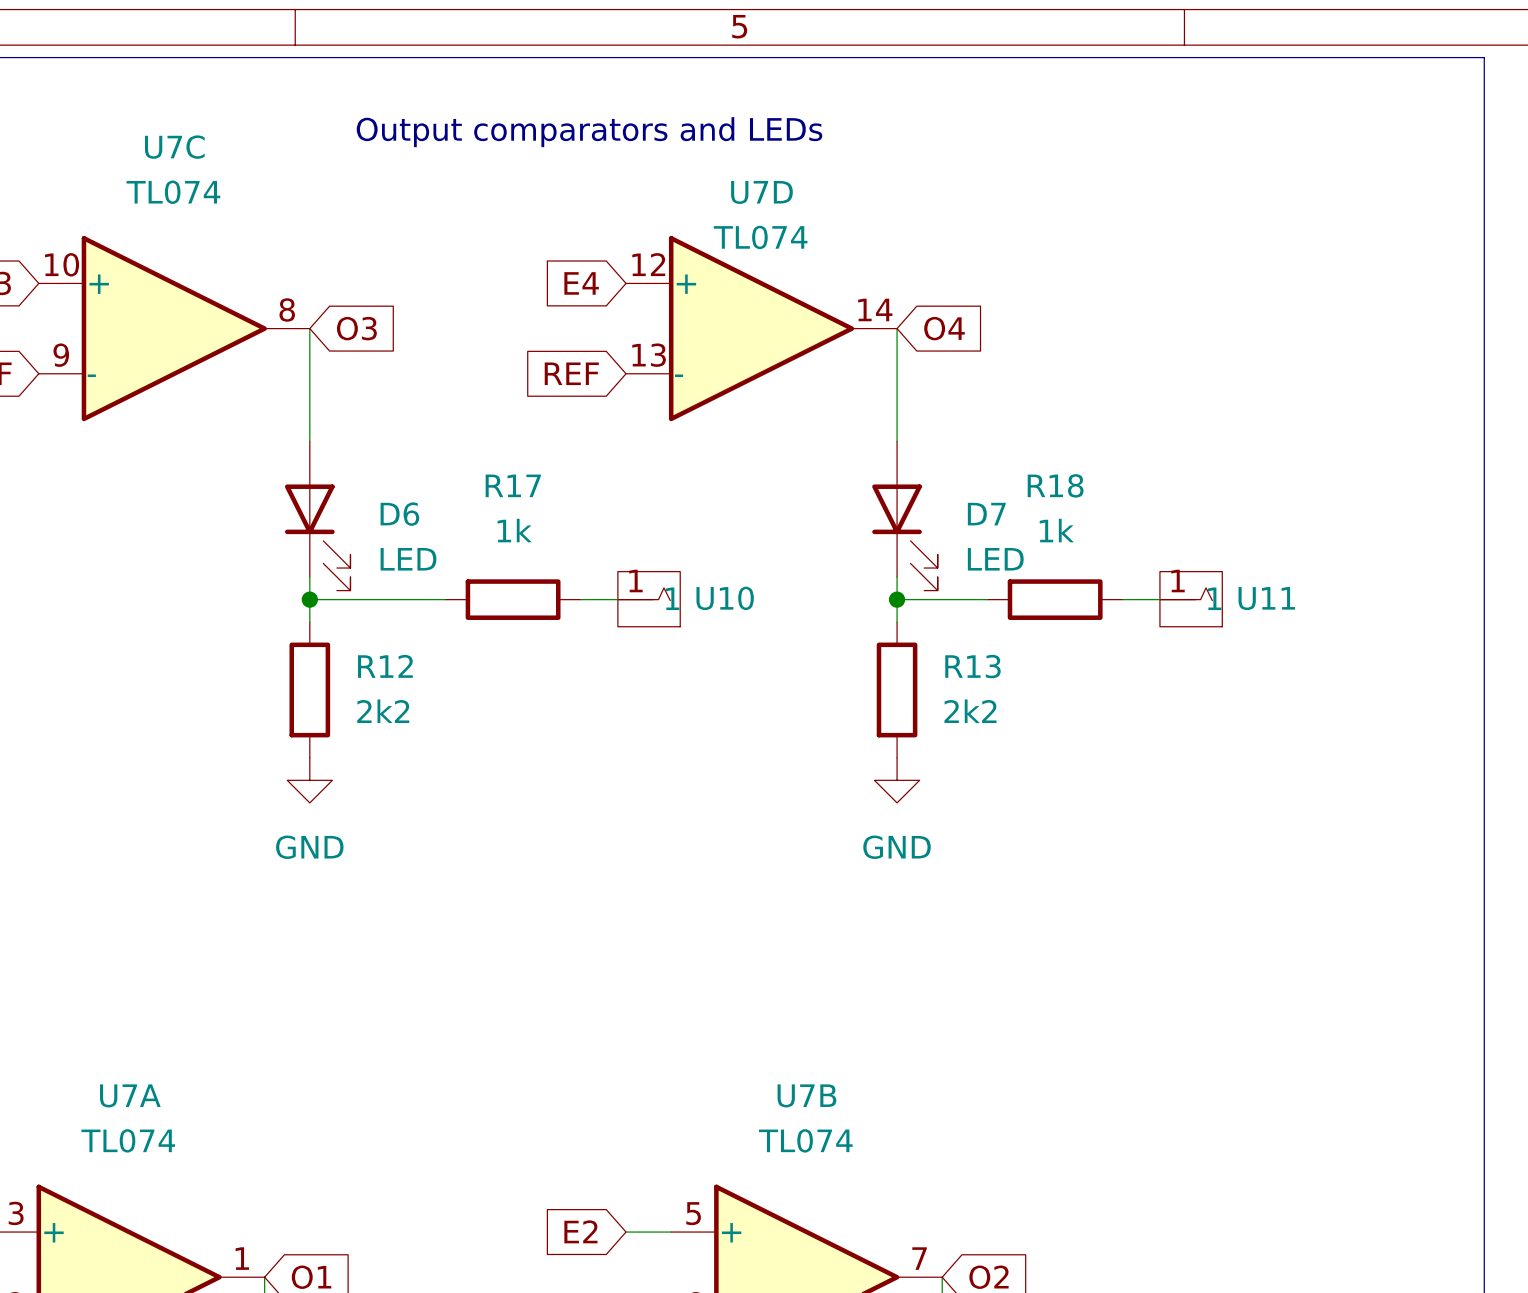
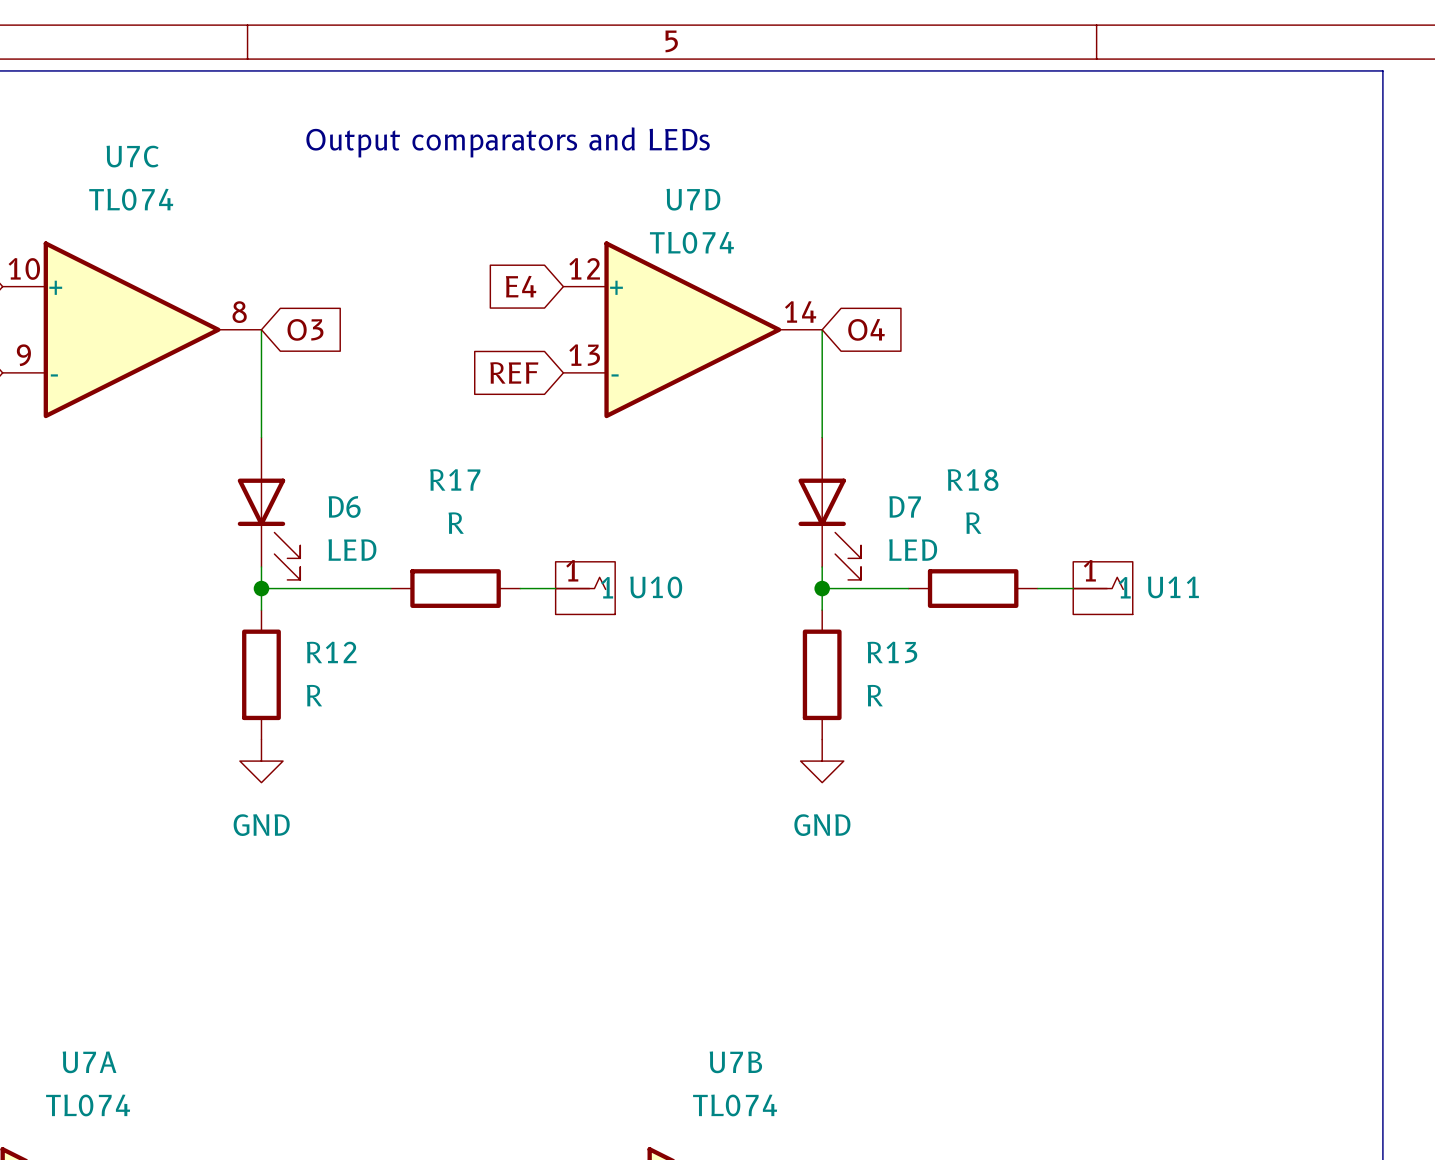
R17 value: 1k (514, 530) -> R (456, 523)
R18 value: 1k (1056, 530) -> R (973, 523)
R12 value: 2k2 (383, 711) -> R (314, 695)
R13 value: 2k2 (970, 711) -> R (875, 695)

